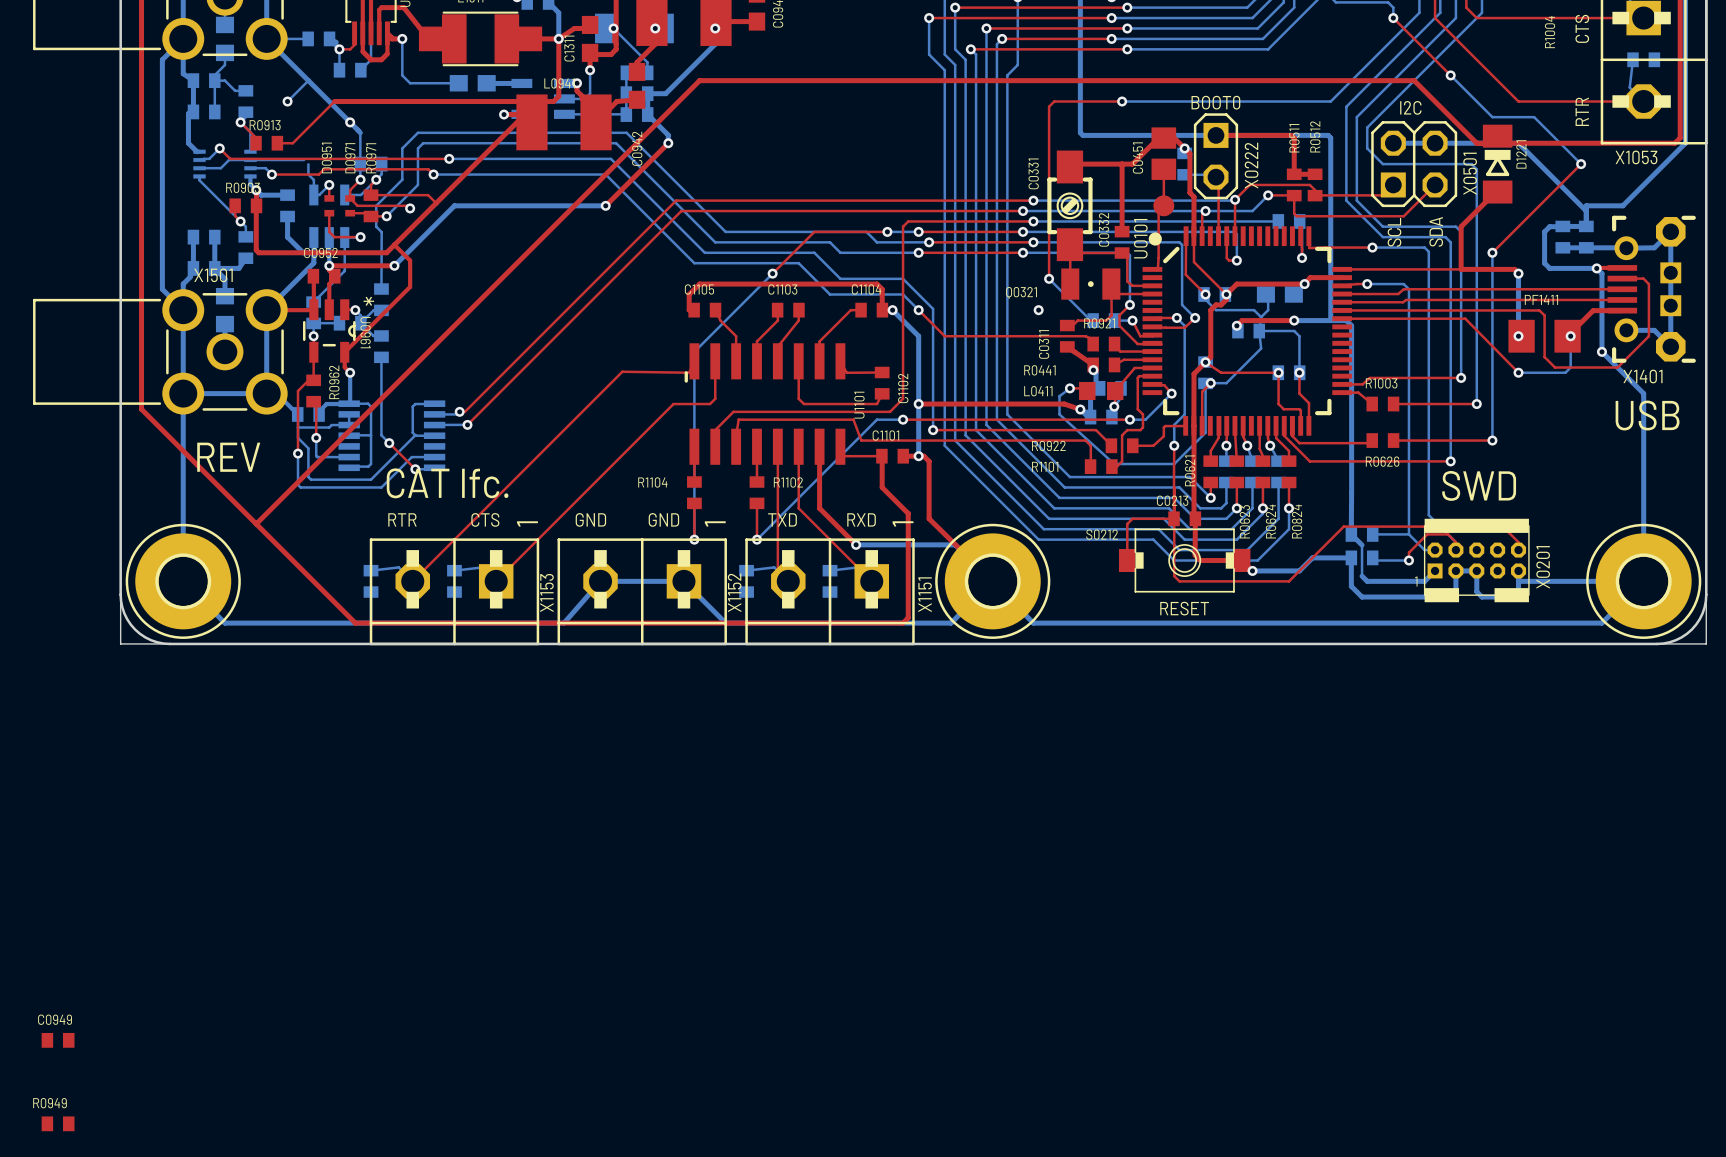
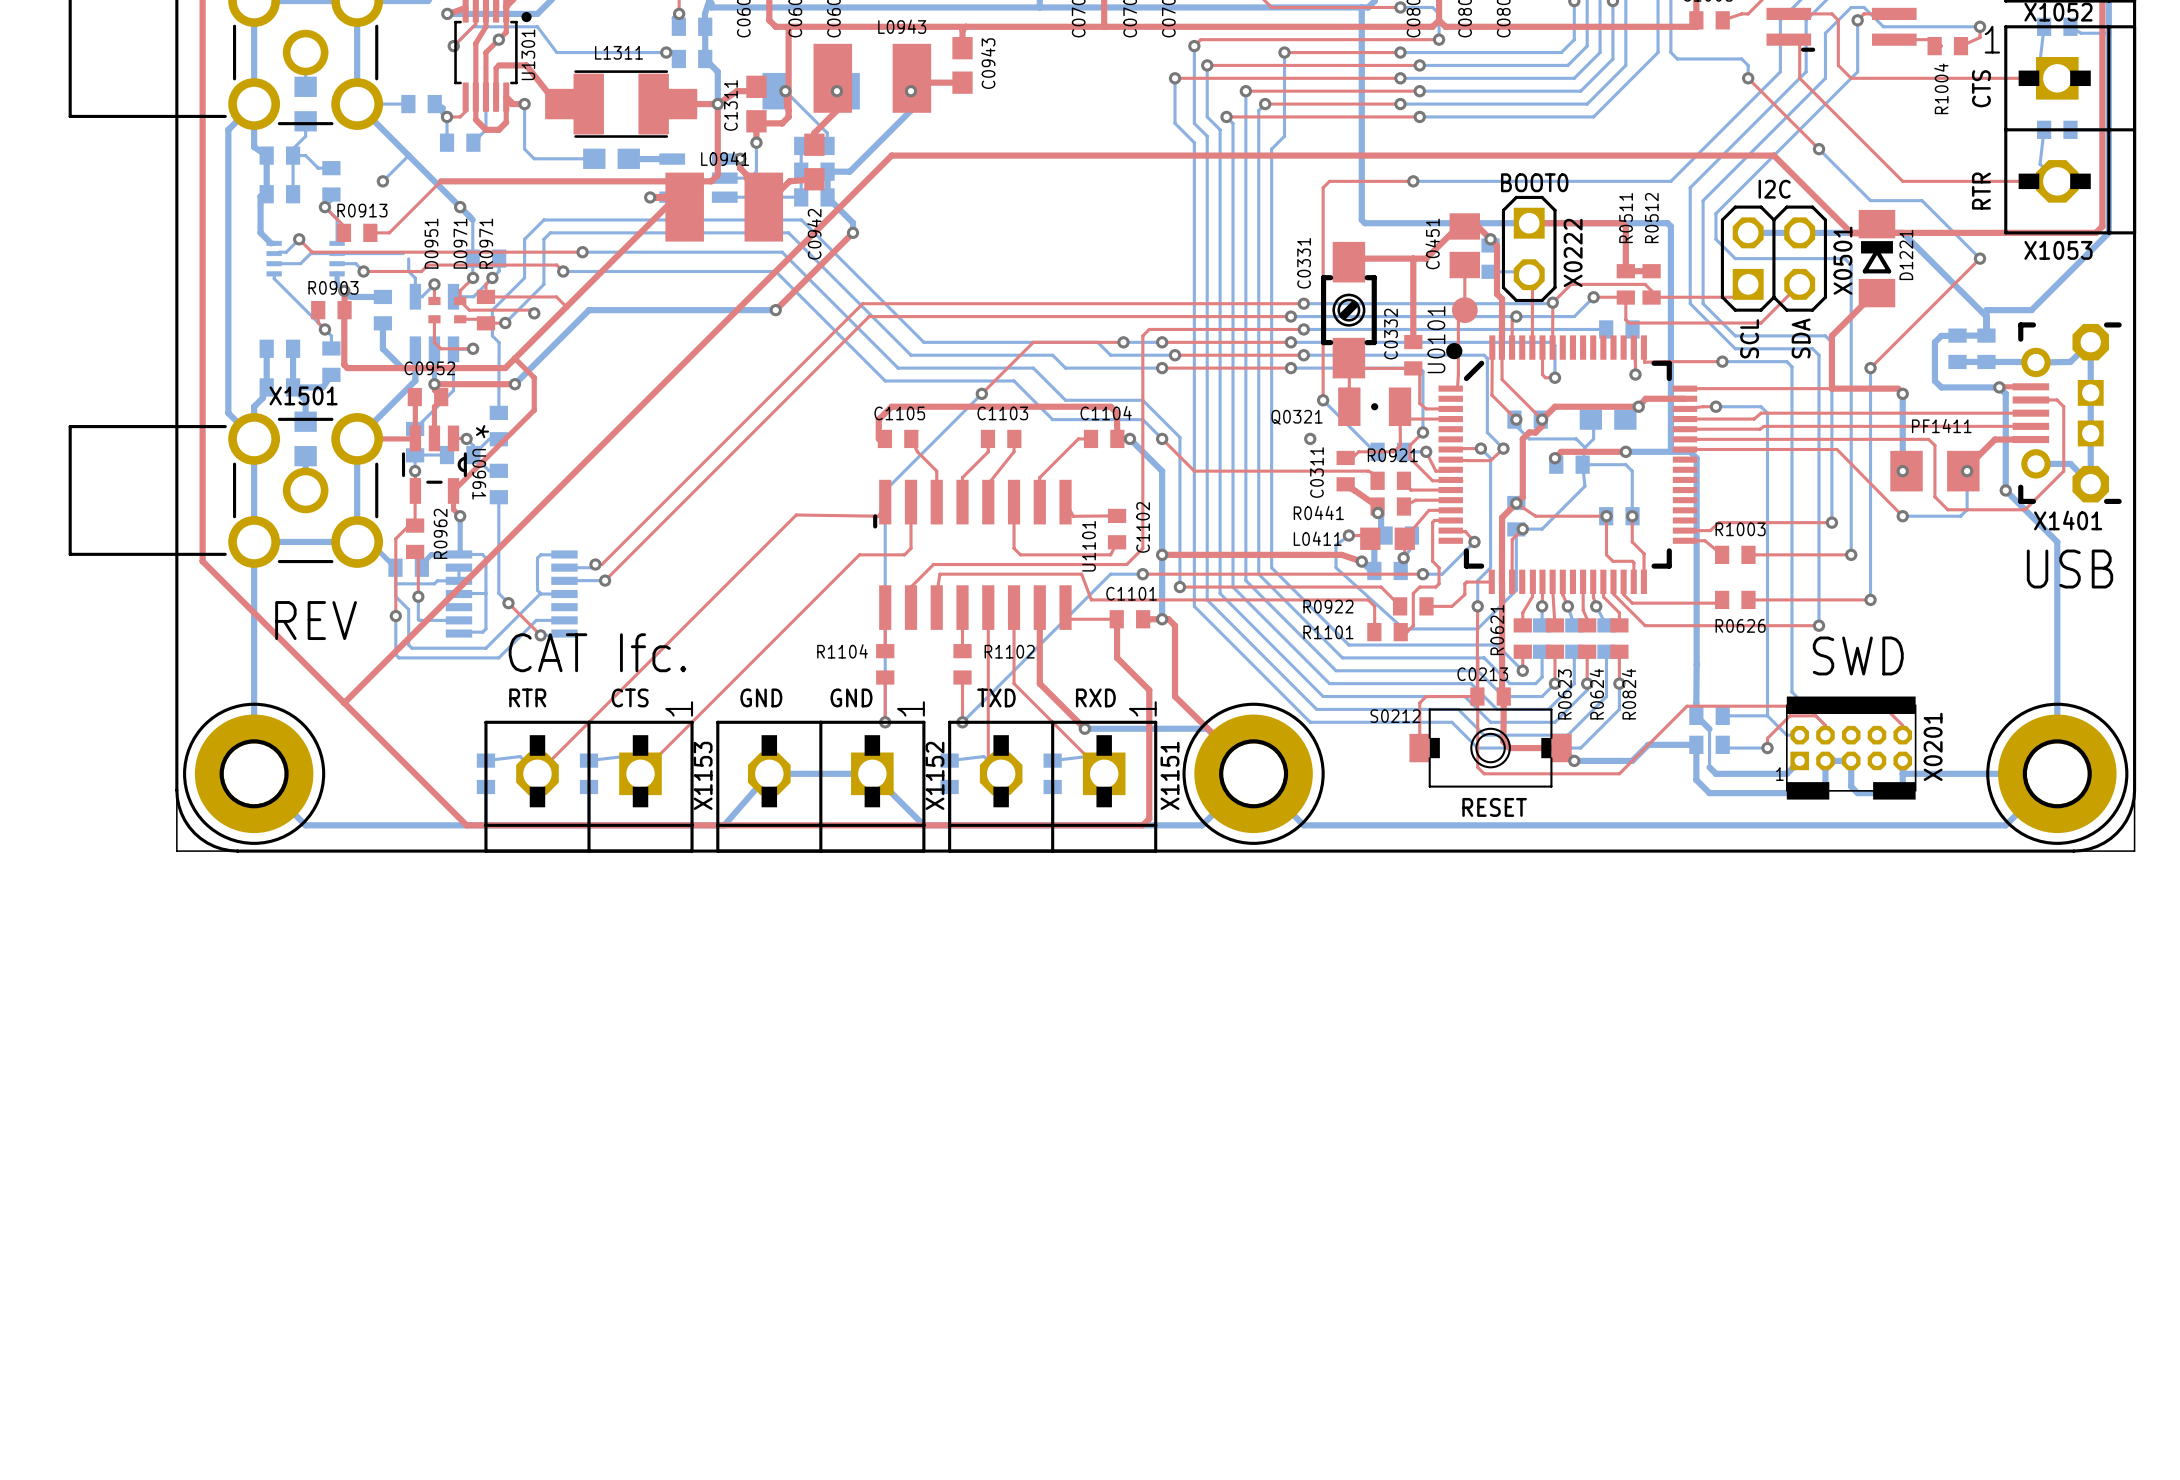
C0949: (58, 1040) -> none
R0949: (58, 1123) -> none

